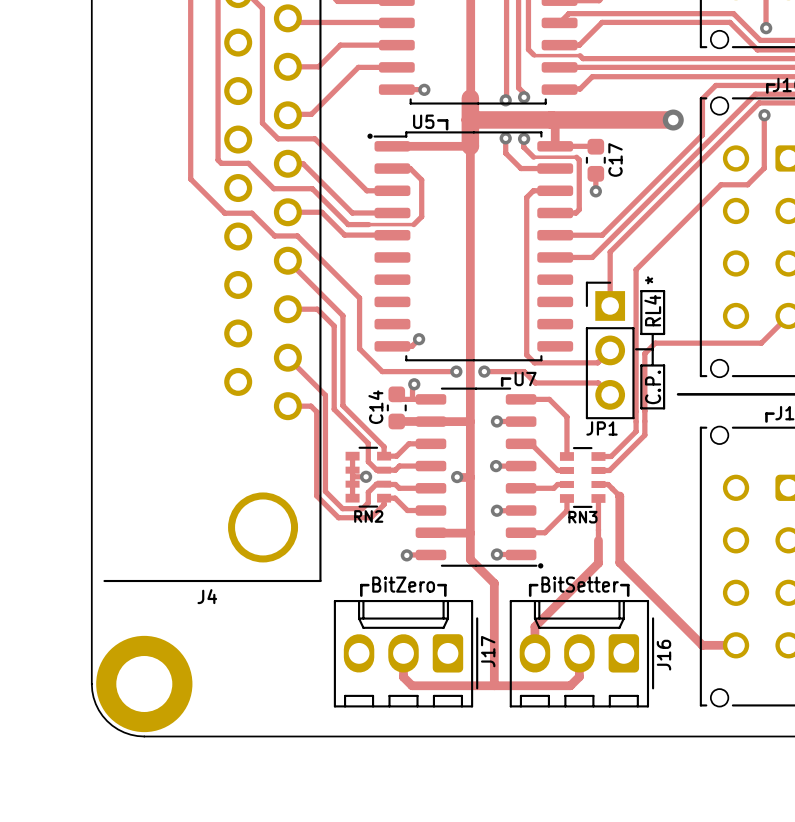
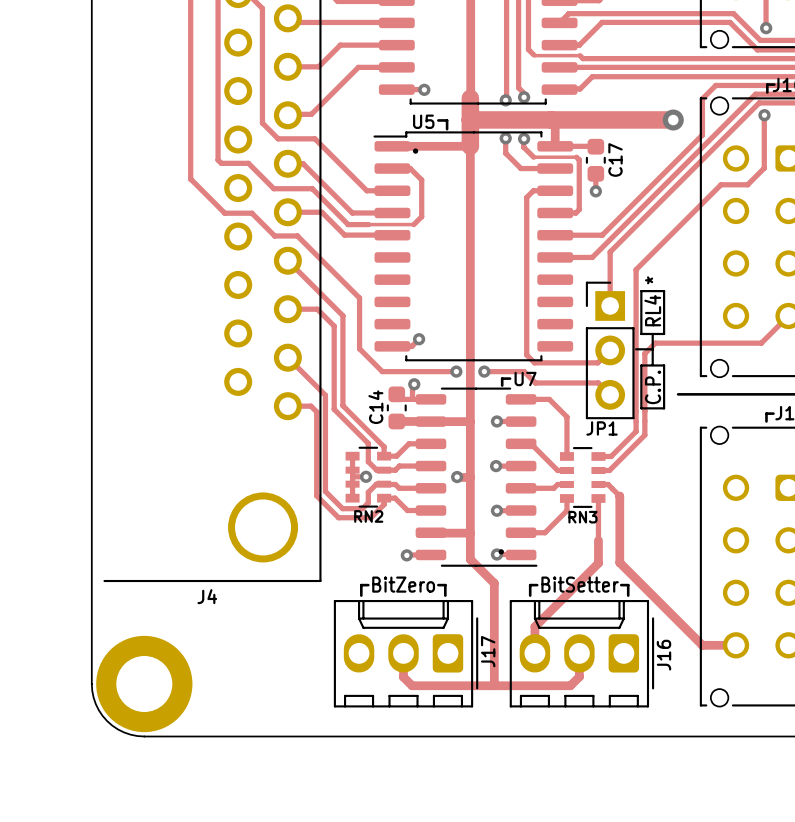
drawing position: (370, 136) -> (415, 151)
drawing position: (540, 565) -> (501, 551)

